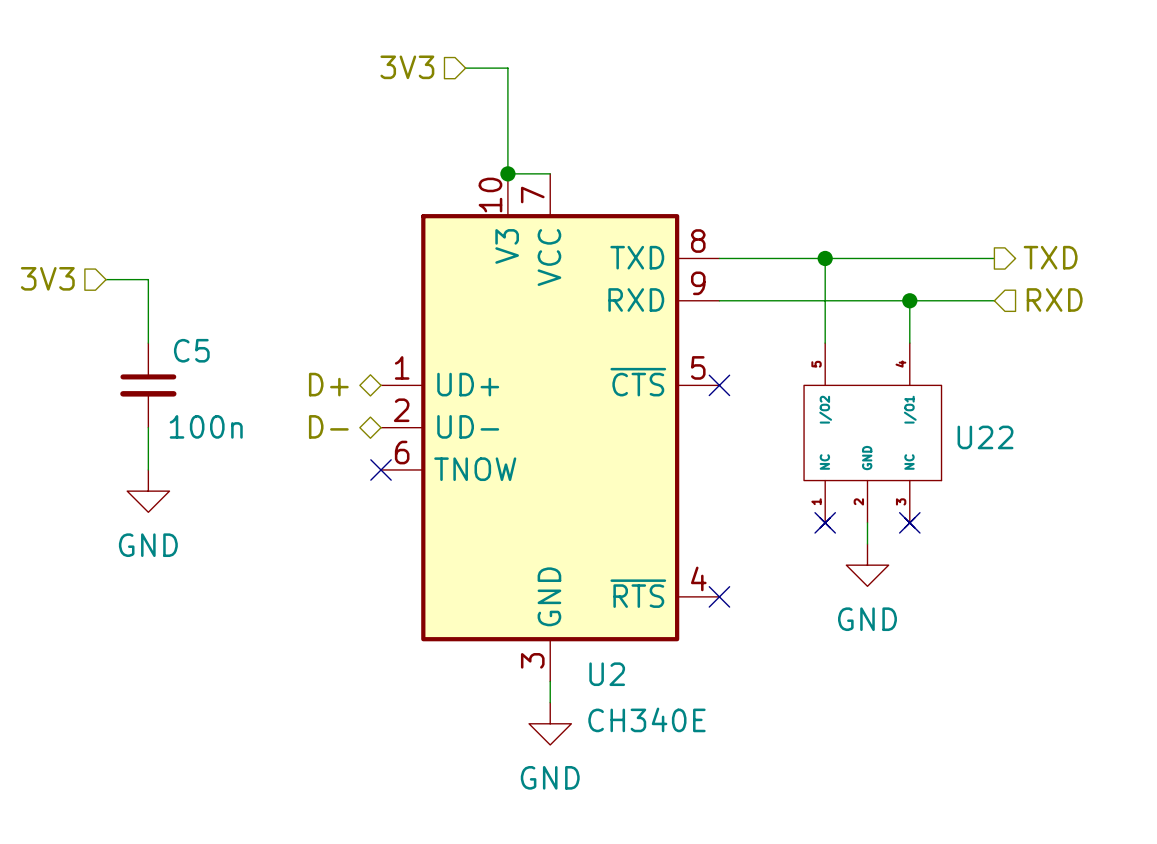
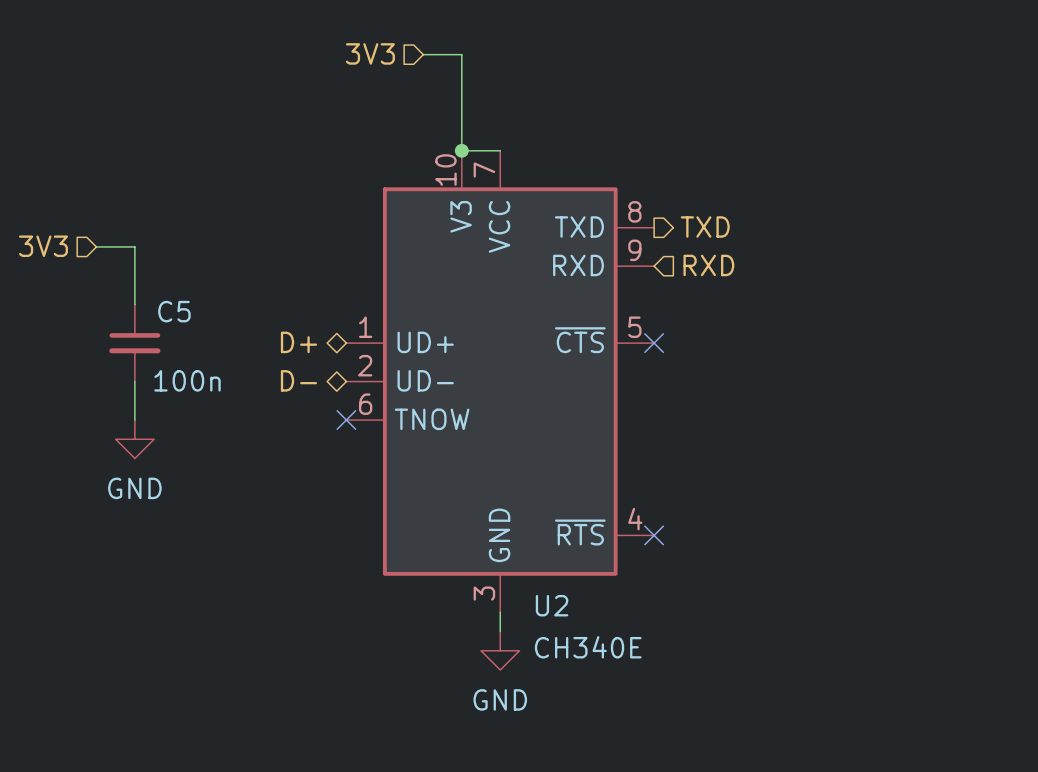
hierarchical label position: TXD (1050, 257) -> TXD (705, 227)
wire: (719, 258) (994, 258) -> none
wire: (825, 258) (825, 343) -> none
junction: (825, 258) -> none
hierarchical label position: RXD (1054, 299) -> RXD (708, 265)
wire: (719, 300) (994, 300) -> none
wire: (909, 300) (909, 343) -> none
junction: (909, 300) -> none
U22: (872, 435) -> none
no-connect mark: (825, 522) -> none
wire: (867, 522) (867, 544) -> none
no-connect mark: (909, 522) -> none
power symbol: GND (867, 565) -> none

